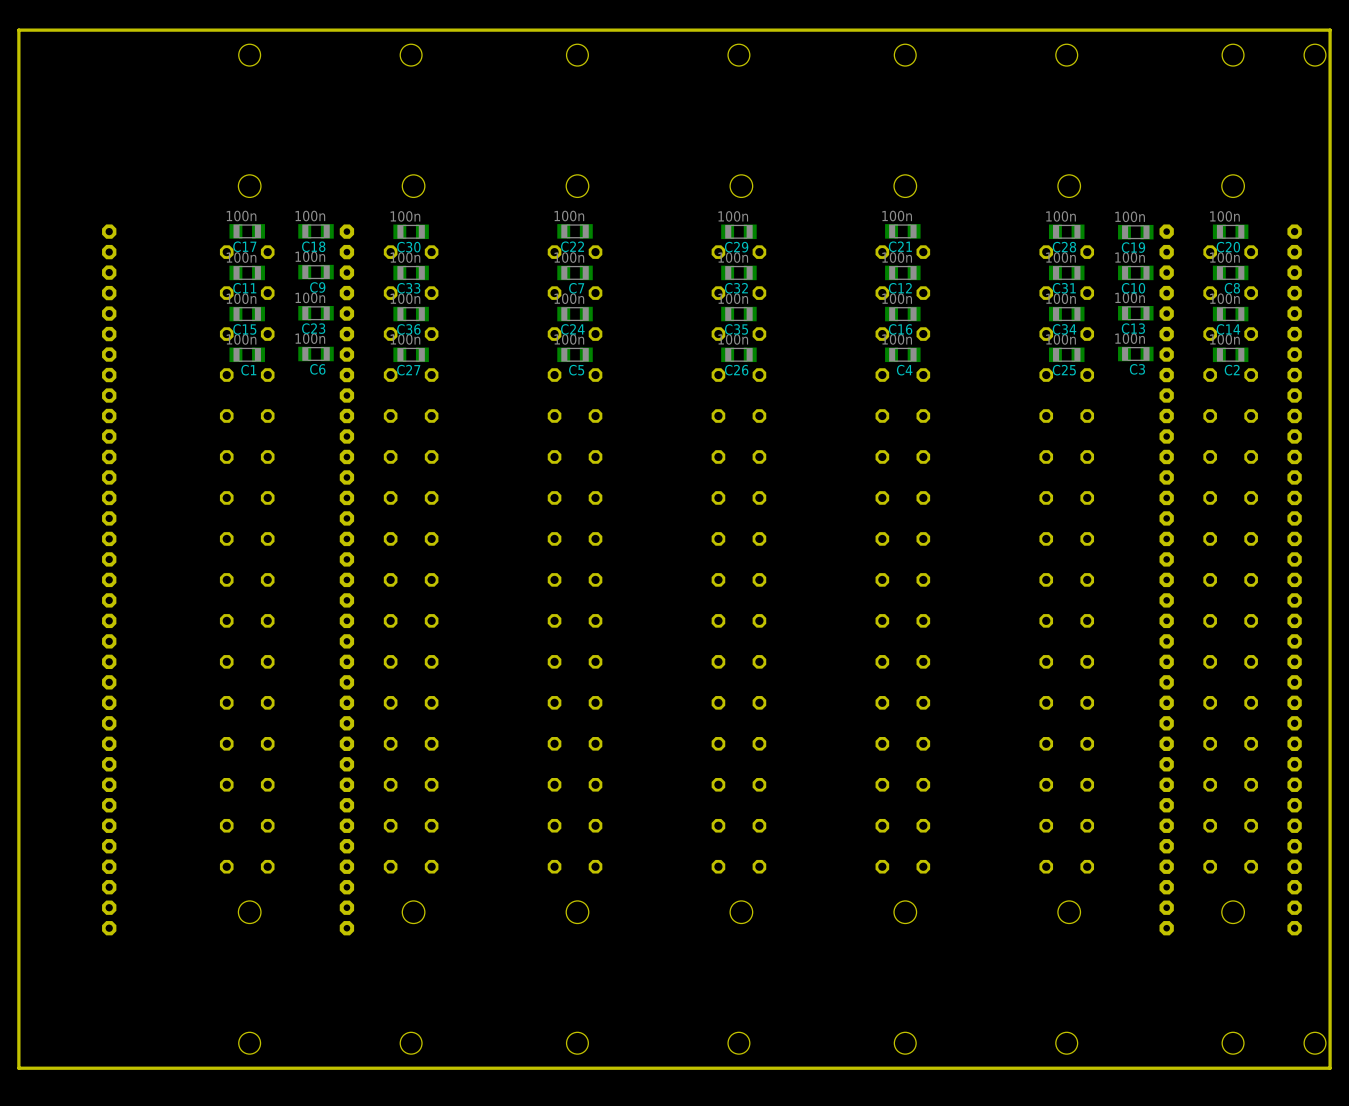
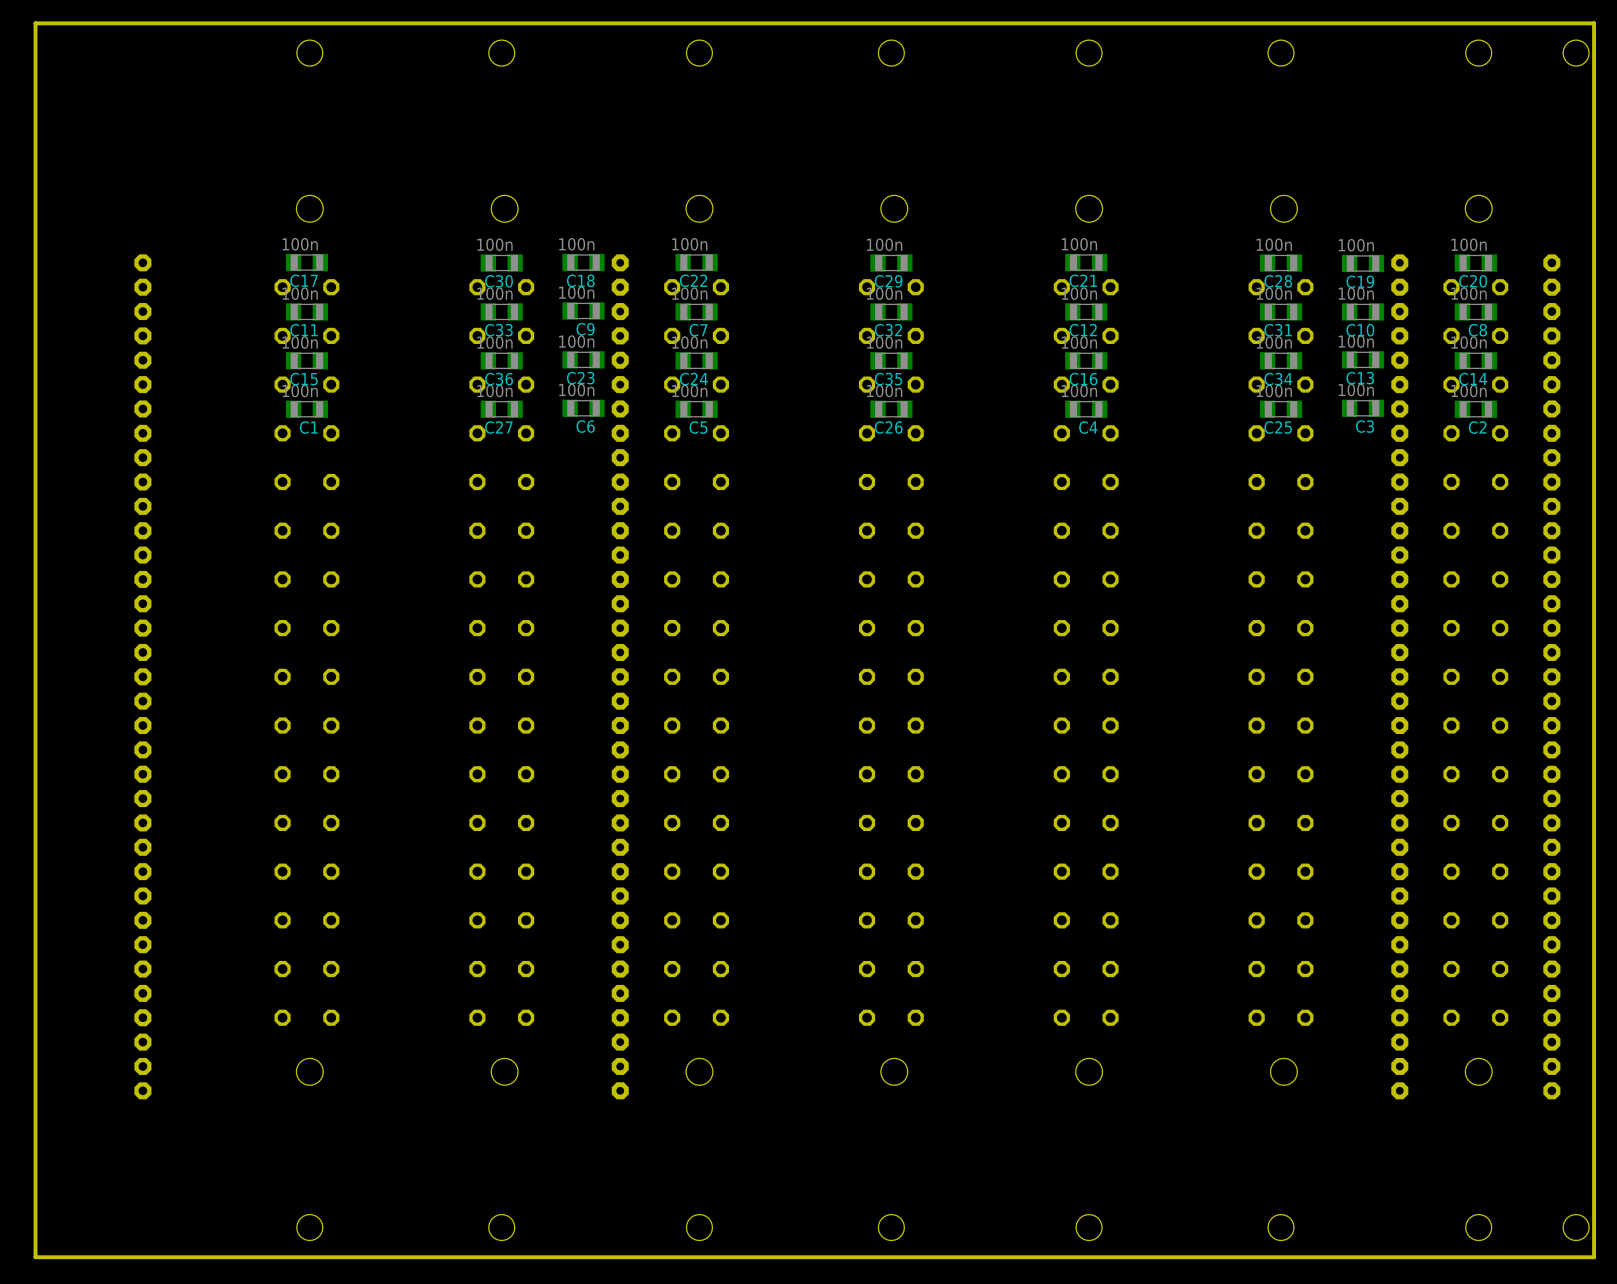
C18 position: (316, 231) -> (583, 262)
C9 position: (316, 272) -> (583, 310)
C23 position: (316, 313) -> (583, 359)
part: (346, 323) -> none
part: none -> (620, 372)
C6 position: (316, 353) -> (583, 408)
part: (346, 528) -> none
part: none -> (620, 615)
part position: (346, 784) -> (620, 920)

